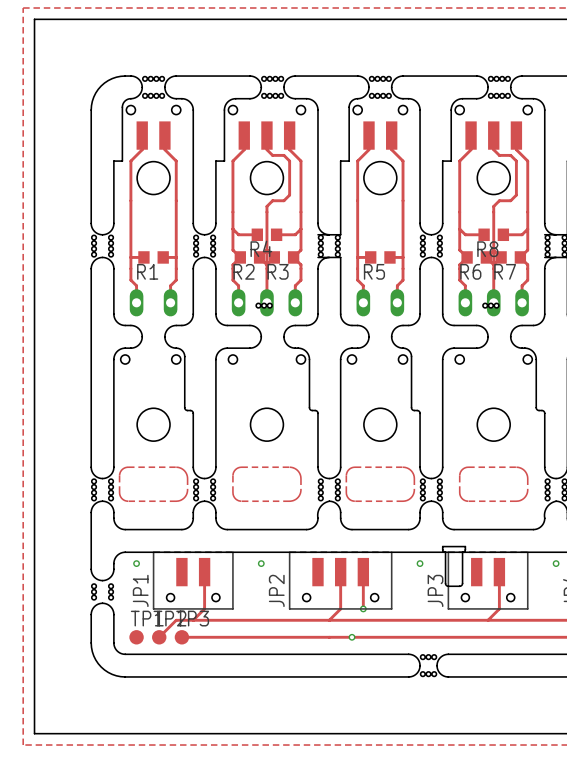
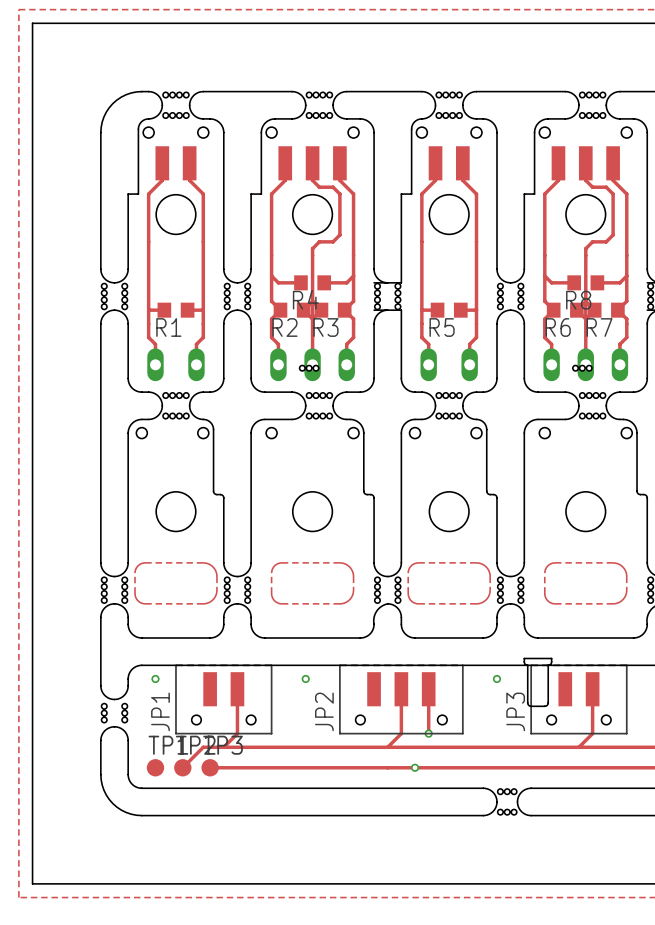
hole: none -> (165, 395)
hole: none -> (172, 395)
hole: none -> (179, 395)
hole: none -> (186, 395)
hole: none -> (309, 395)
hole: none -> (315, 395)
hole: none -> (322, 395)
hole: none -> (329, 395)
hole: none -> (438, 395)
hole: none -> (445, 395)
hole: none -> (452, 395)
hole: none -> (459, 395)
hole: none -> (582, 395)
hole: none -> (589, 395)
hole: none -> (596, 395)
hole: none -> (602, 395)
hole: none -> (165, 416)
hole: none -> (172, 416)
hole: none -> (179, 416)
hole: none -> (186, 416)
hole: none -> (309, 416)
hole: none -> (315, 416)
hole: none -> (322, 416)
hole: none -> (329, 416)
hole: none -> (438, 416)
hole: none -> (445, 416)
hole: none -> (452, 416)
hole: none -> (459, 416)
hole: none -> (582, 416)
hole: none -> (589, 416)
hole: none -> (596, 416)
hole: none -> (602, 416)

